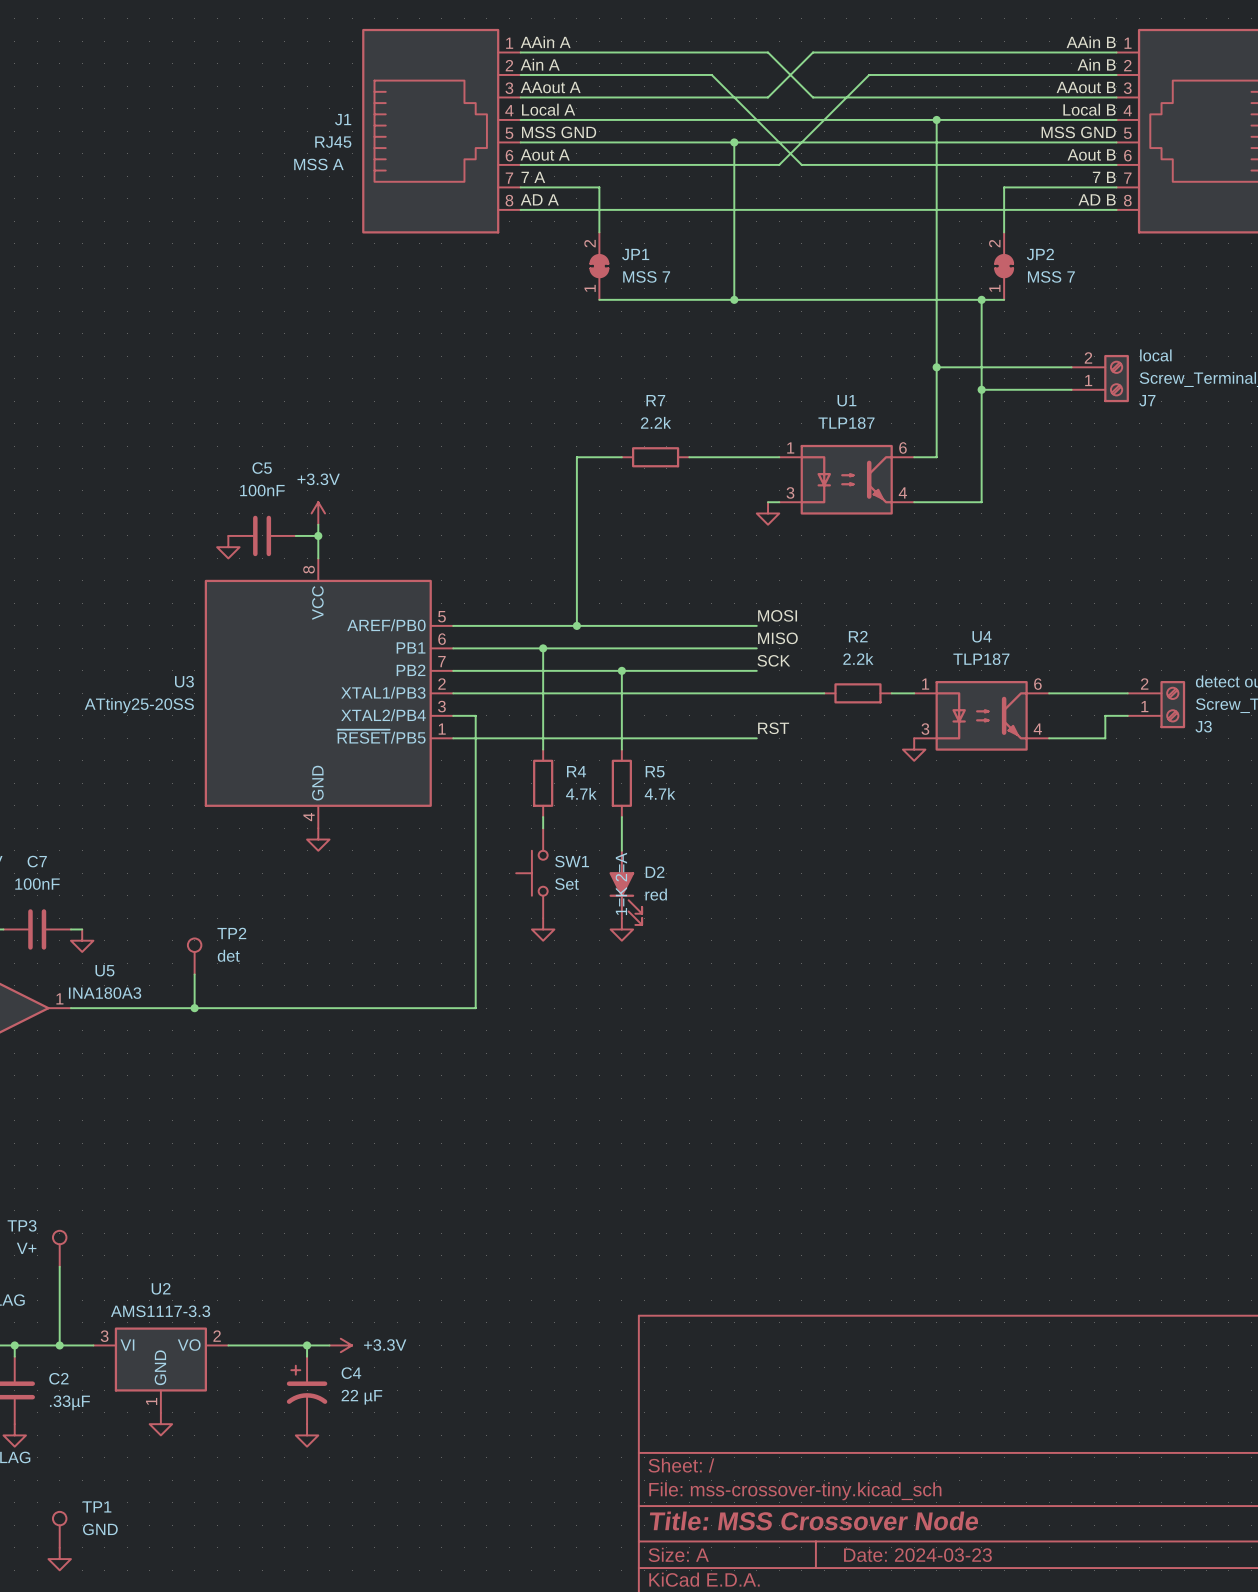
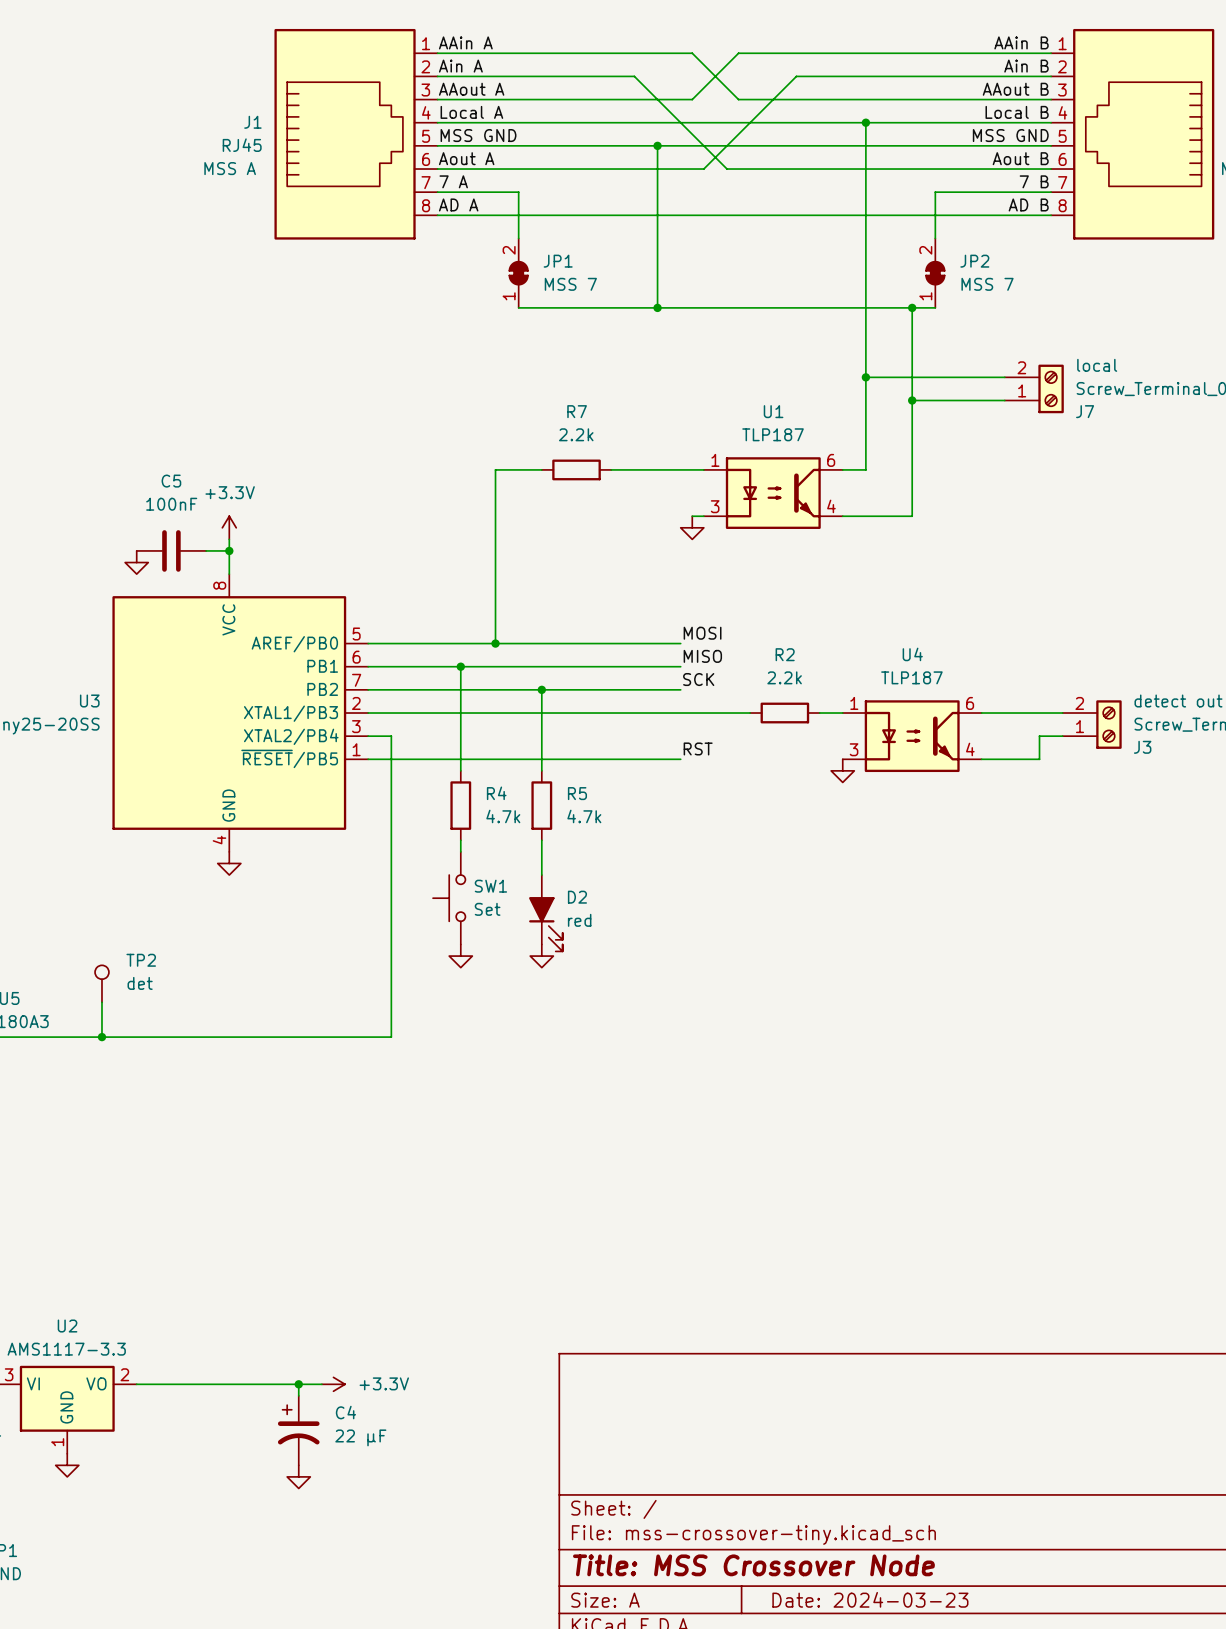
D2 text: 1=K 2=A (621, 883) -> none
wire: (307, 1345) (307, 1356) -> (298, 1384) (298, 1395)
junction: (307, 1345) -> none
wire: none -> (240, 1384) (321, 1384)
power symbol position: +3.3V (340, 1345) -> +3.3V (333, 1384)
junction: none -> (298, 1384)
C4 position: (307, 1390) -> (298, 1430)
power symbol position: (307, 1435) -> (298, 1476)

